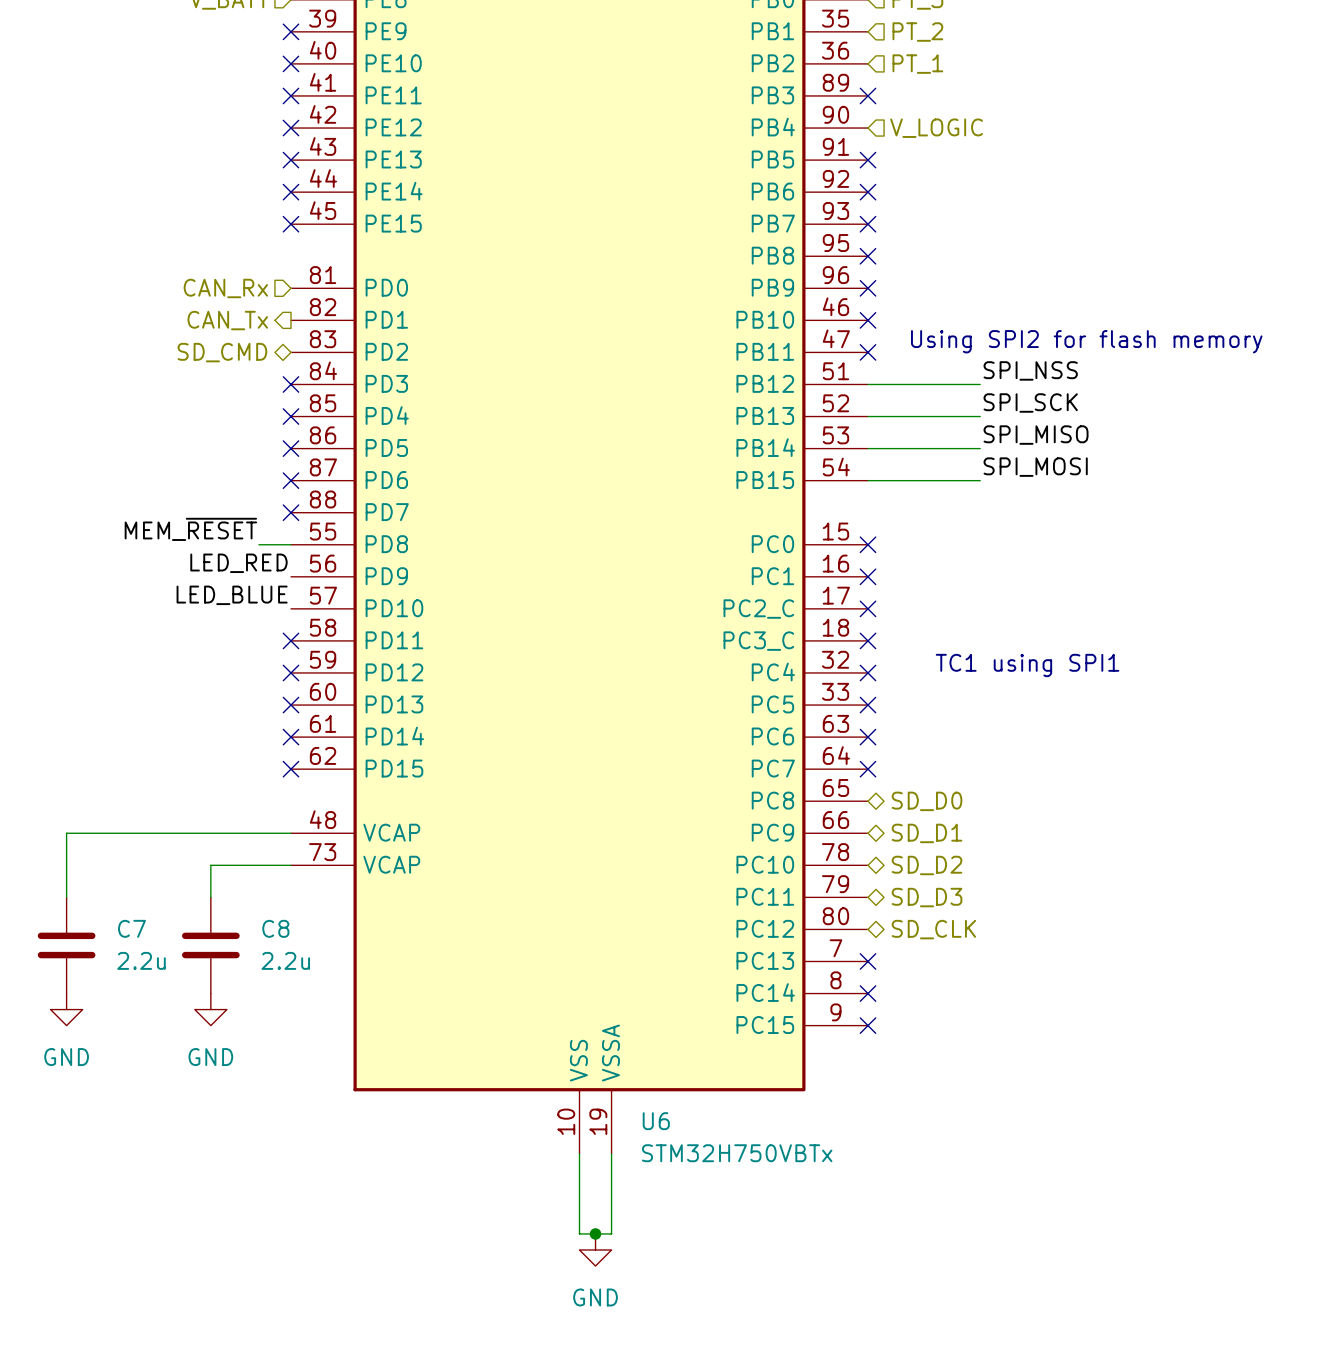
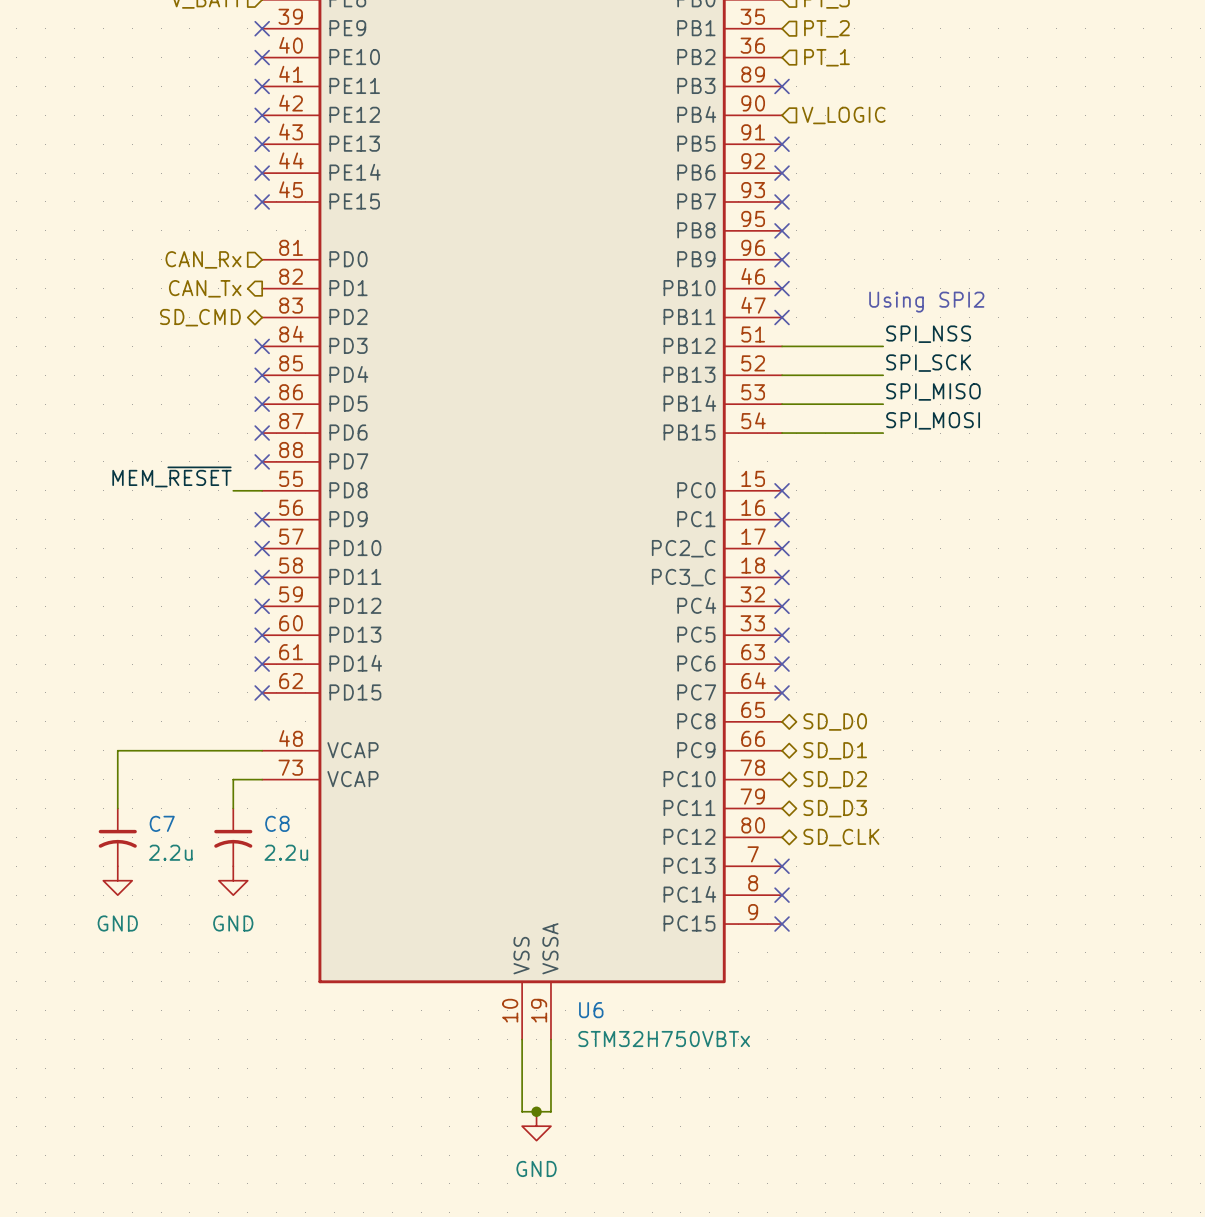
text: none -> Using SPI2 (926, 302)
text: Using SPI2 for flash memory (1086, 341) -> none
label: LED_RED (238, 563) -> none
no-connect mark: none -> (262, 519)
label: LED_BLUE (232, 595) -> none
no-connect mark: none -> (262, 548)
text: TC1 using SPI1 (1027, 665) -> none
wire: (130, 833) (66, 833) (66, 897) -> (117, 750) (117, 808)
wire: (258, 865) (210, 865) (210, 897) -> (233, 779) (233, 808)
C7 symbol: [37, 897, 96, 994] -> [98, 808, 137, 867]
C8 symbol: [182, 897, 240, 994] -> [214, 808, 253, 867]
power symbol: none -> GND (117, 880)
power symbol: none -> GND (233, 880)
power symbol: GND (66, 1009) -> none
power symbol: GND (210, 1009) -> none

